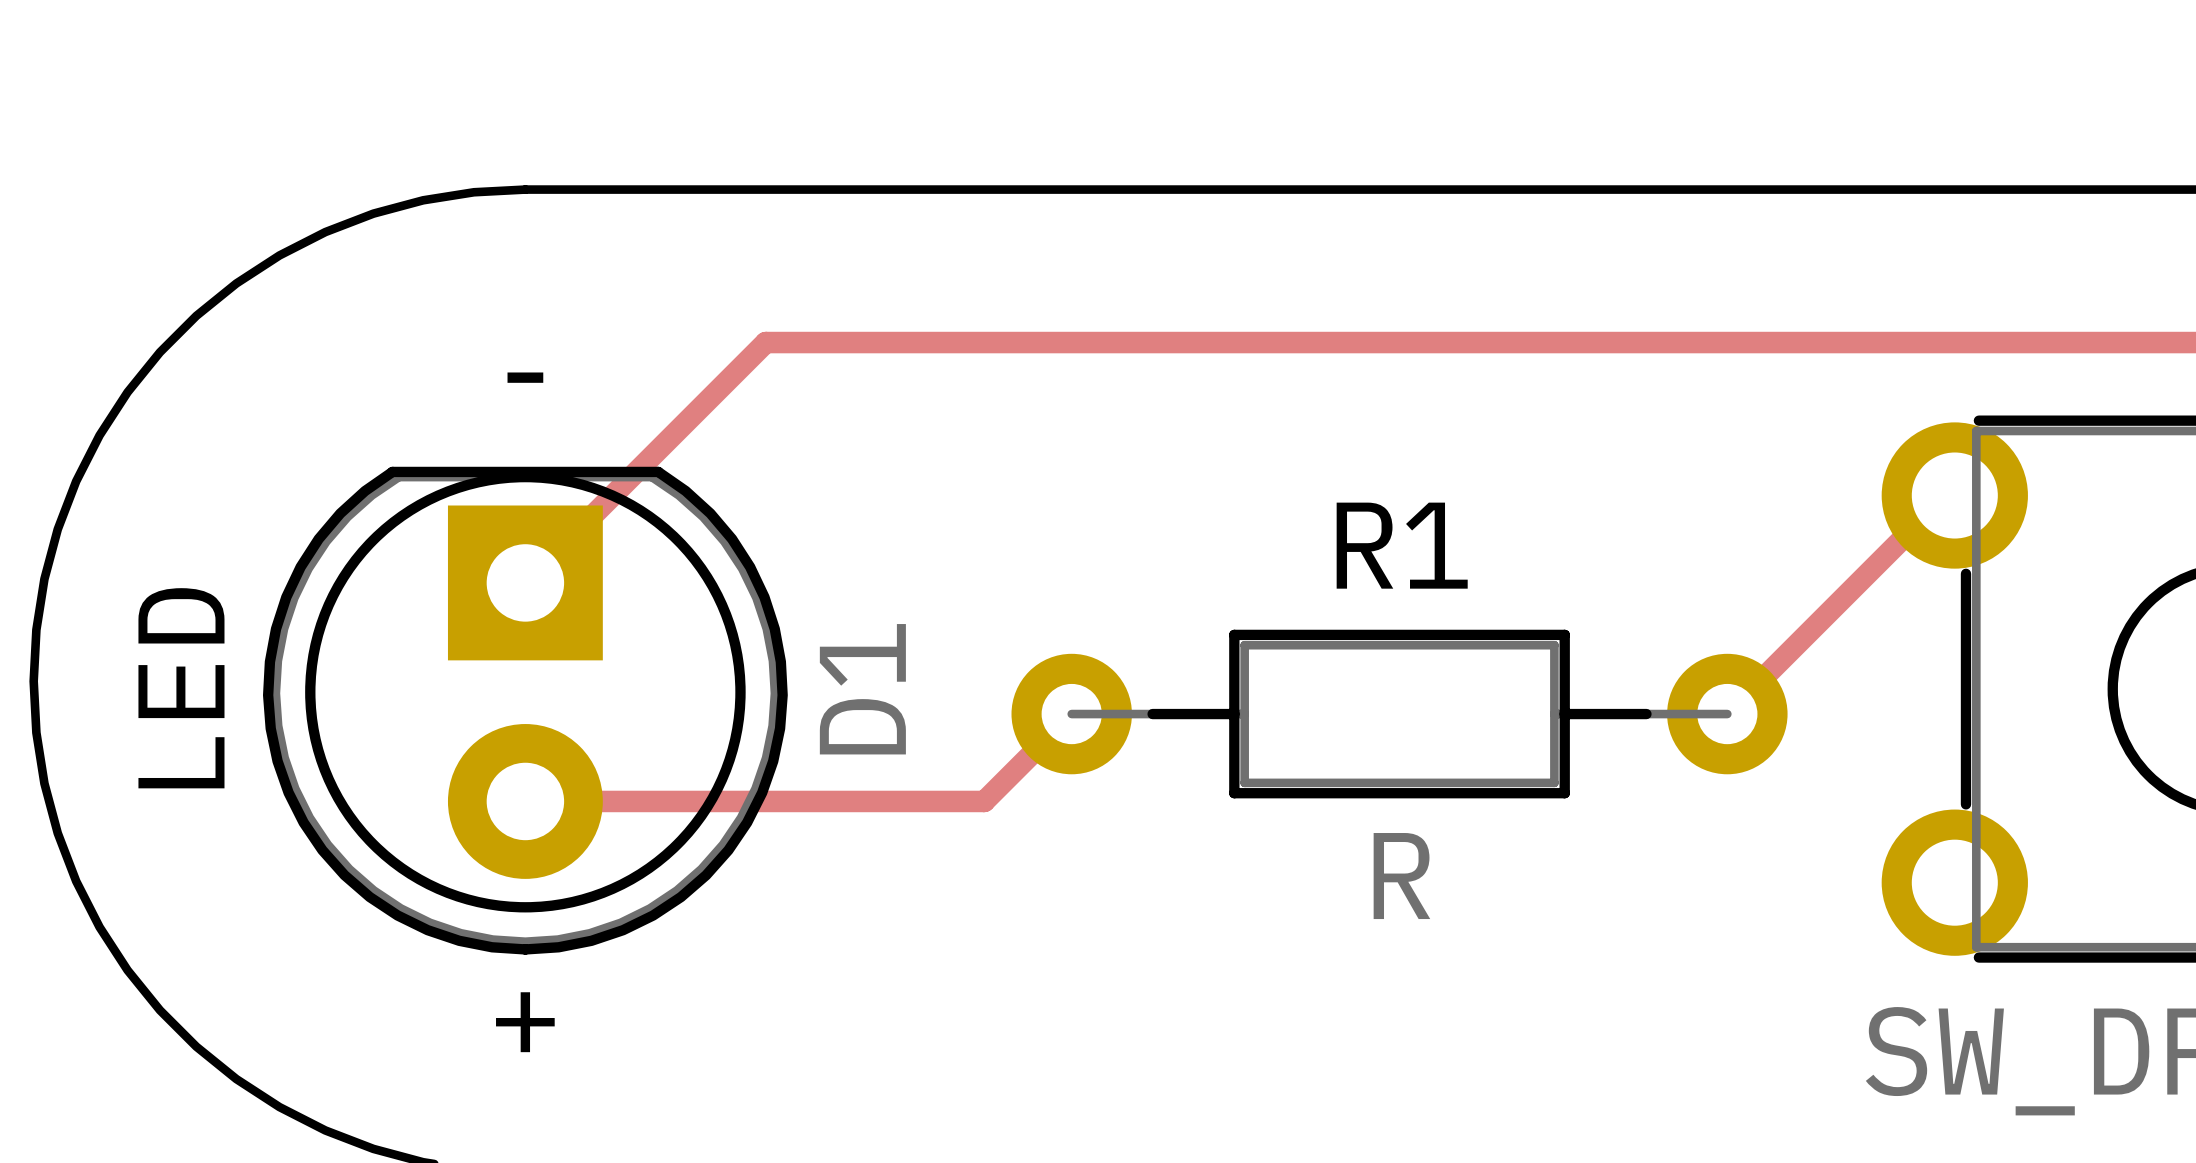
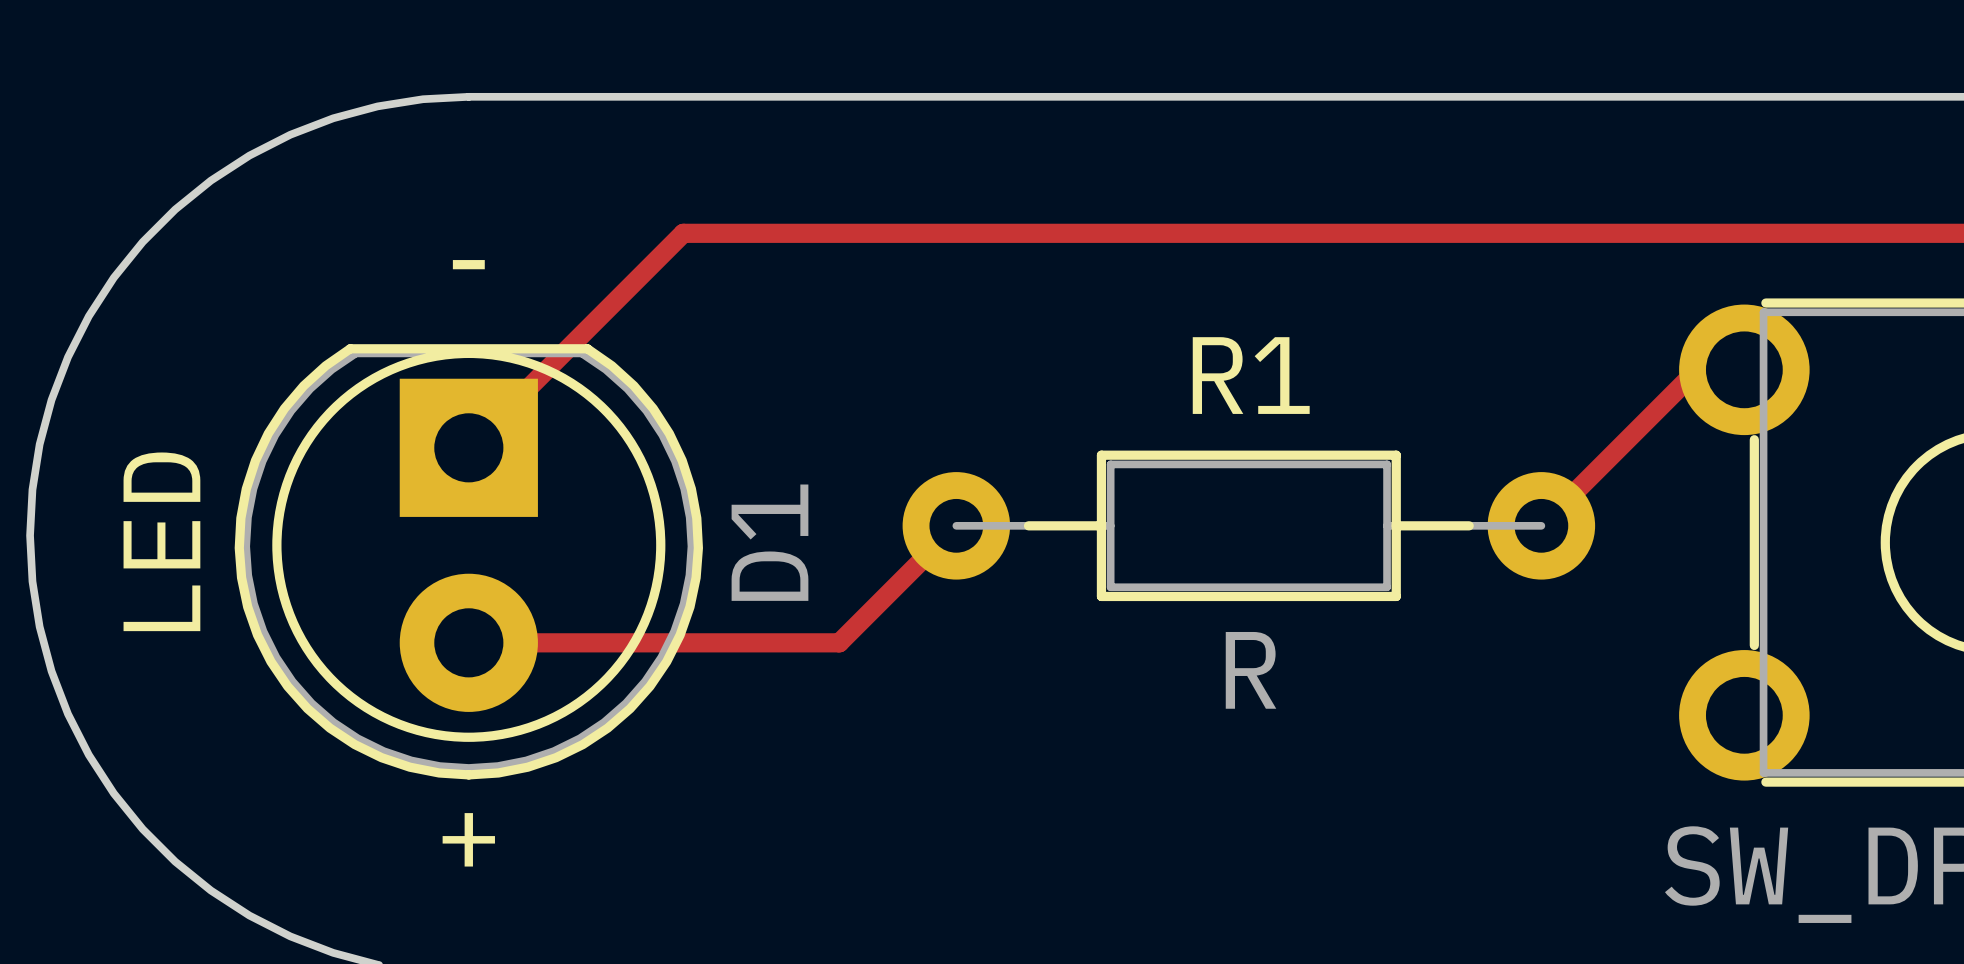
top track: (1945, 495) (1727, 714) -> (1736, 369) (1697, 369) (1541, 525)
top track: (1071, 714) (984, 801) (940, 801) -> (956, 525) (839, 642)
R1 position: (1399, 714) -> (1248, 525)

